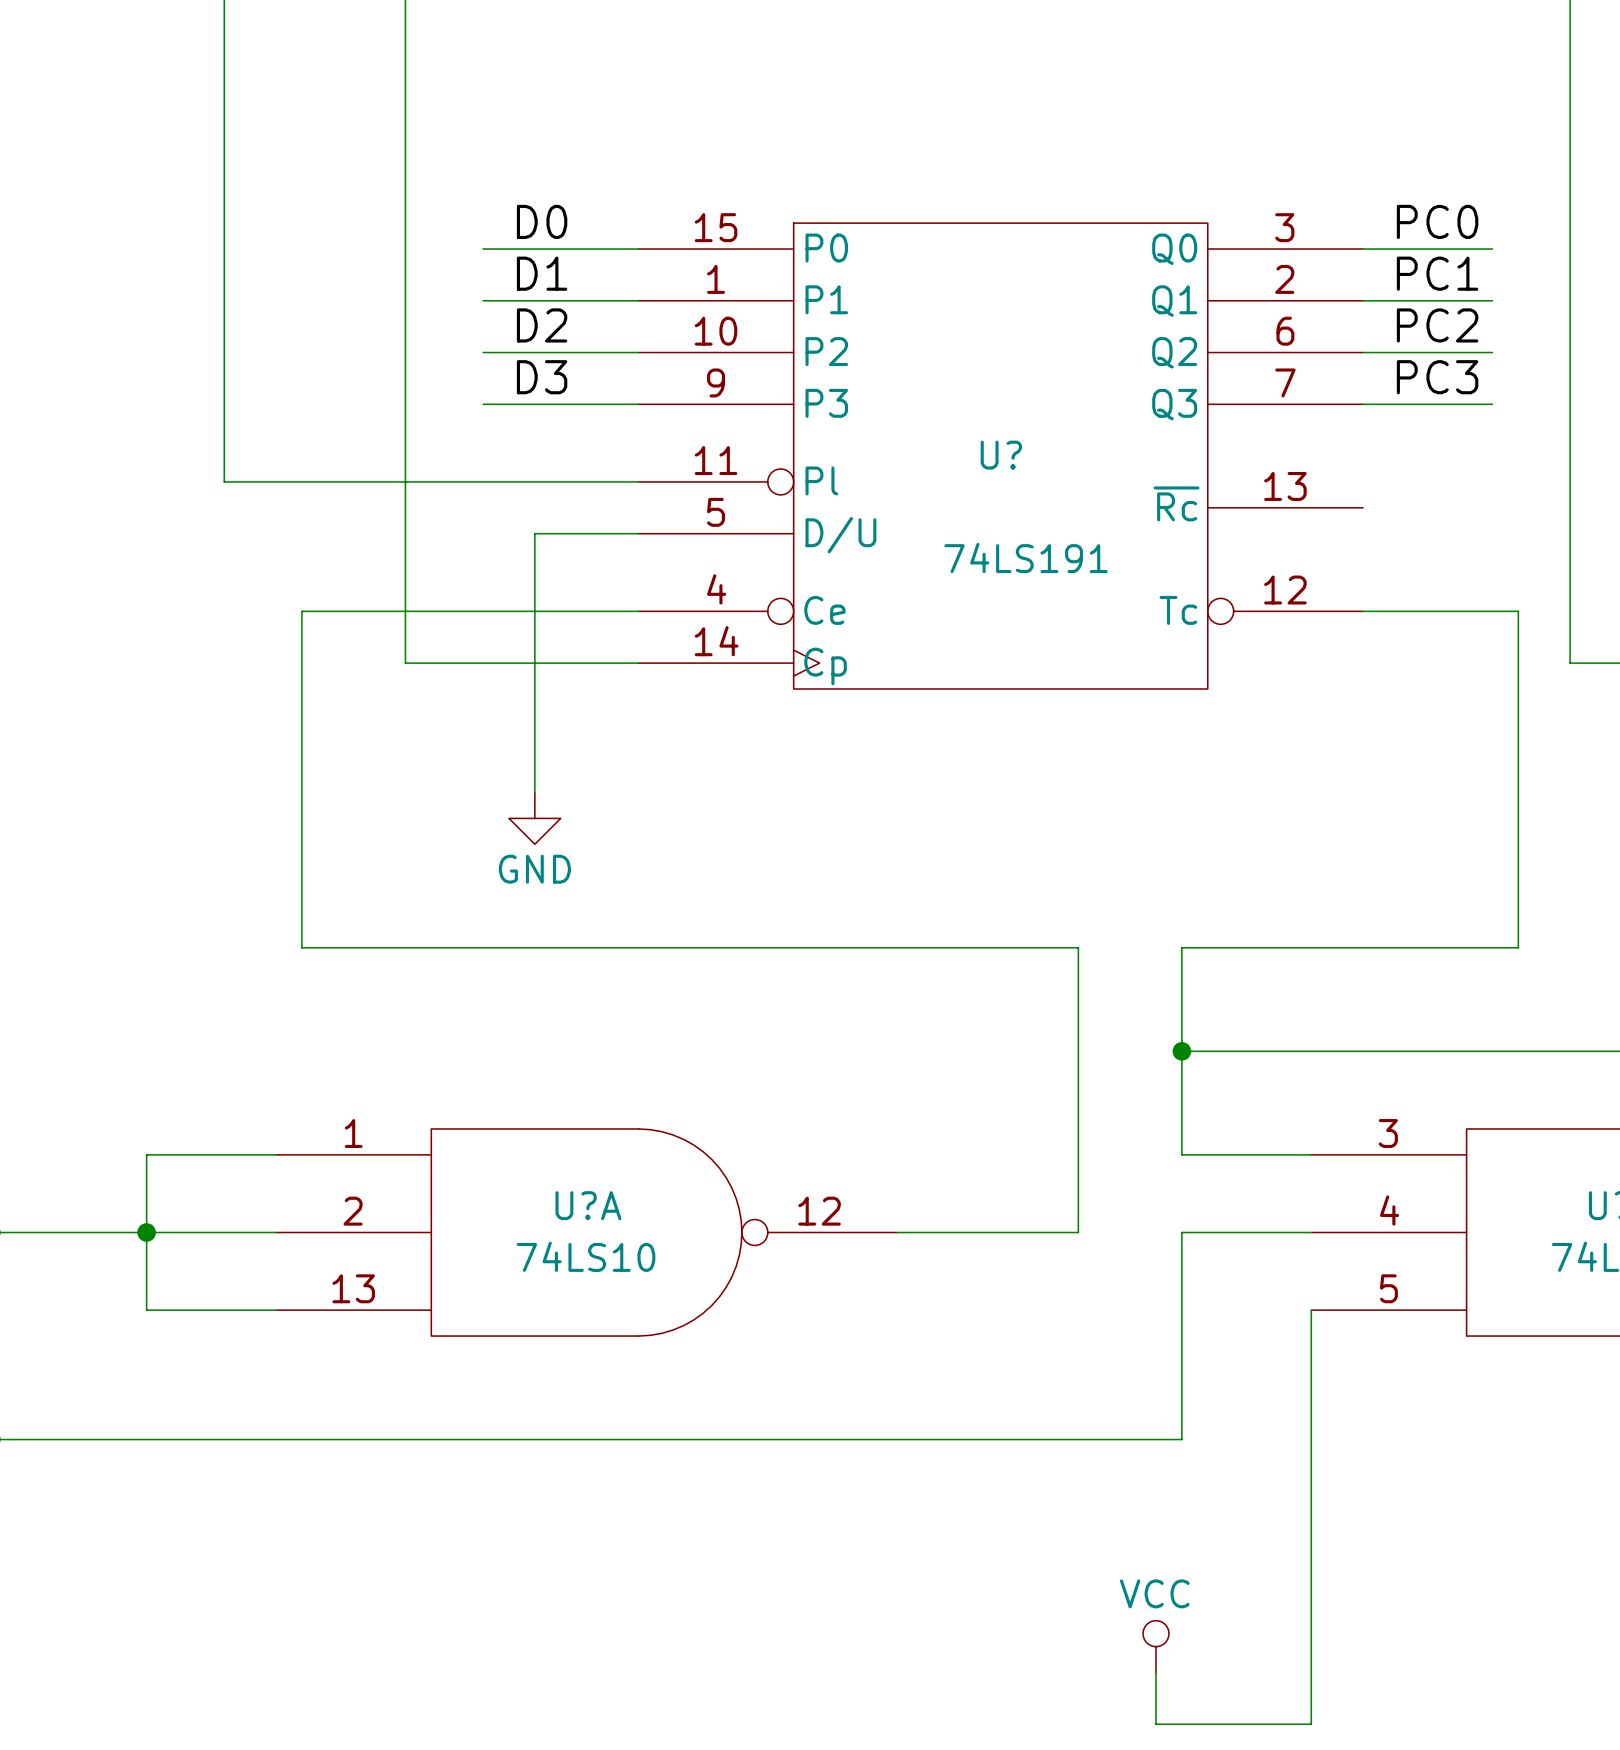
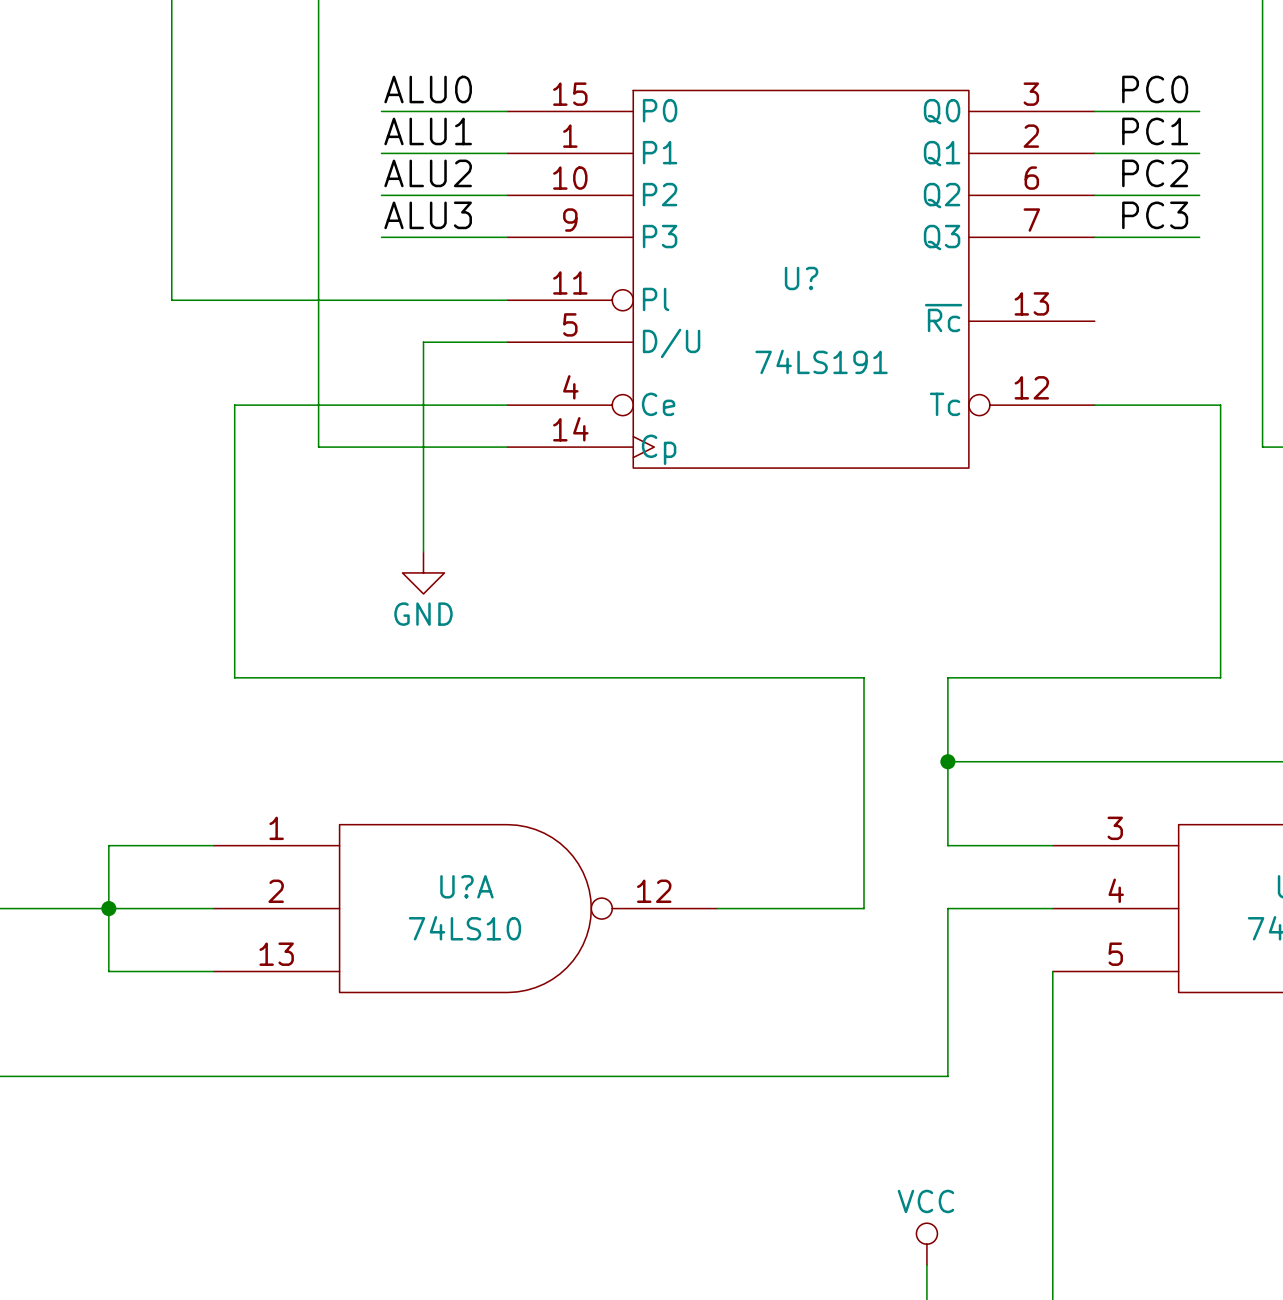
label: none -> ALU0 (428, 89)
label: D0 (542, 221) -> none
label: none -> ALU1 (428, 131)
label: D1 (542, 273) -> none
label: none -> ALU2 (428, 173)
label: D2 (542, 325) -> none
label: none -> ALU3 (428, 215)
label: D3 (542, 377) -> none

